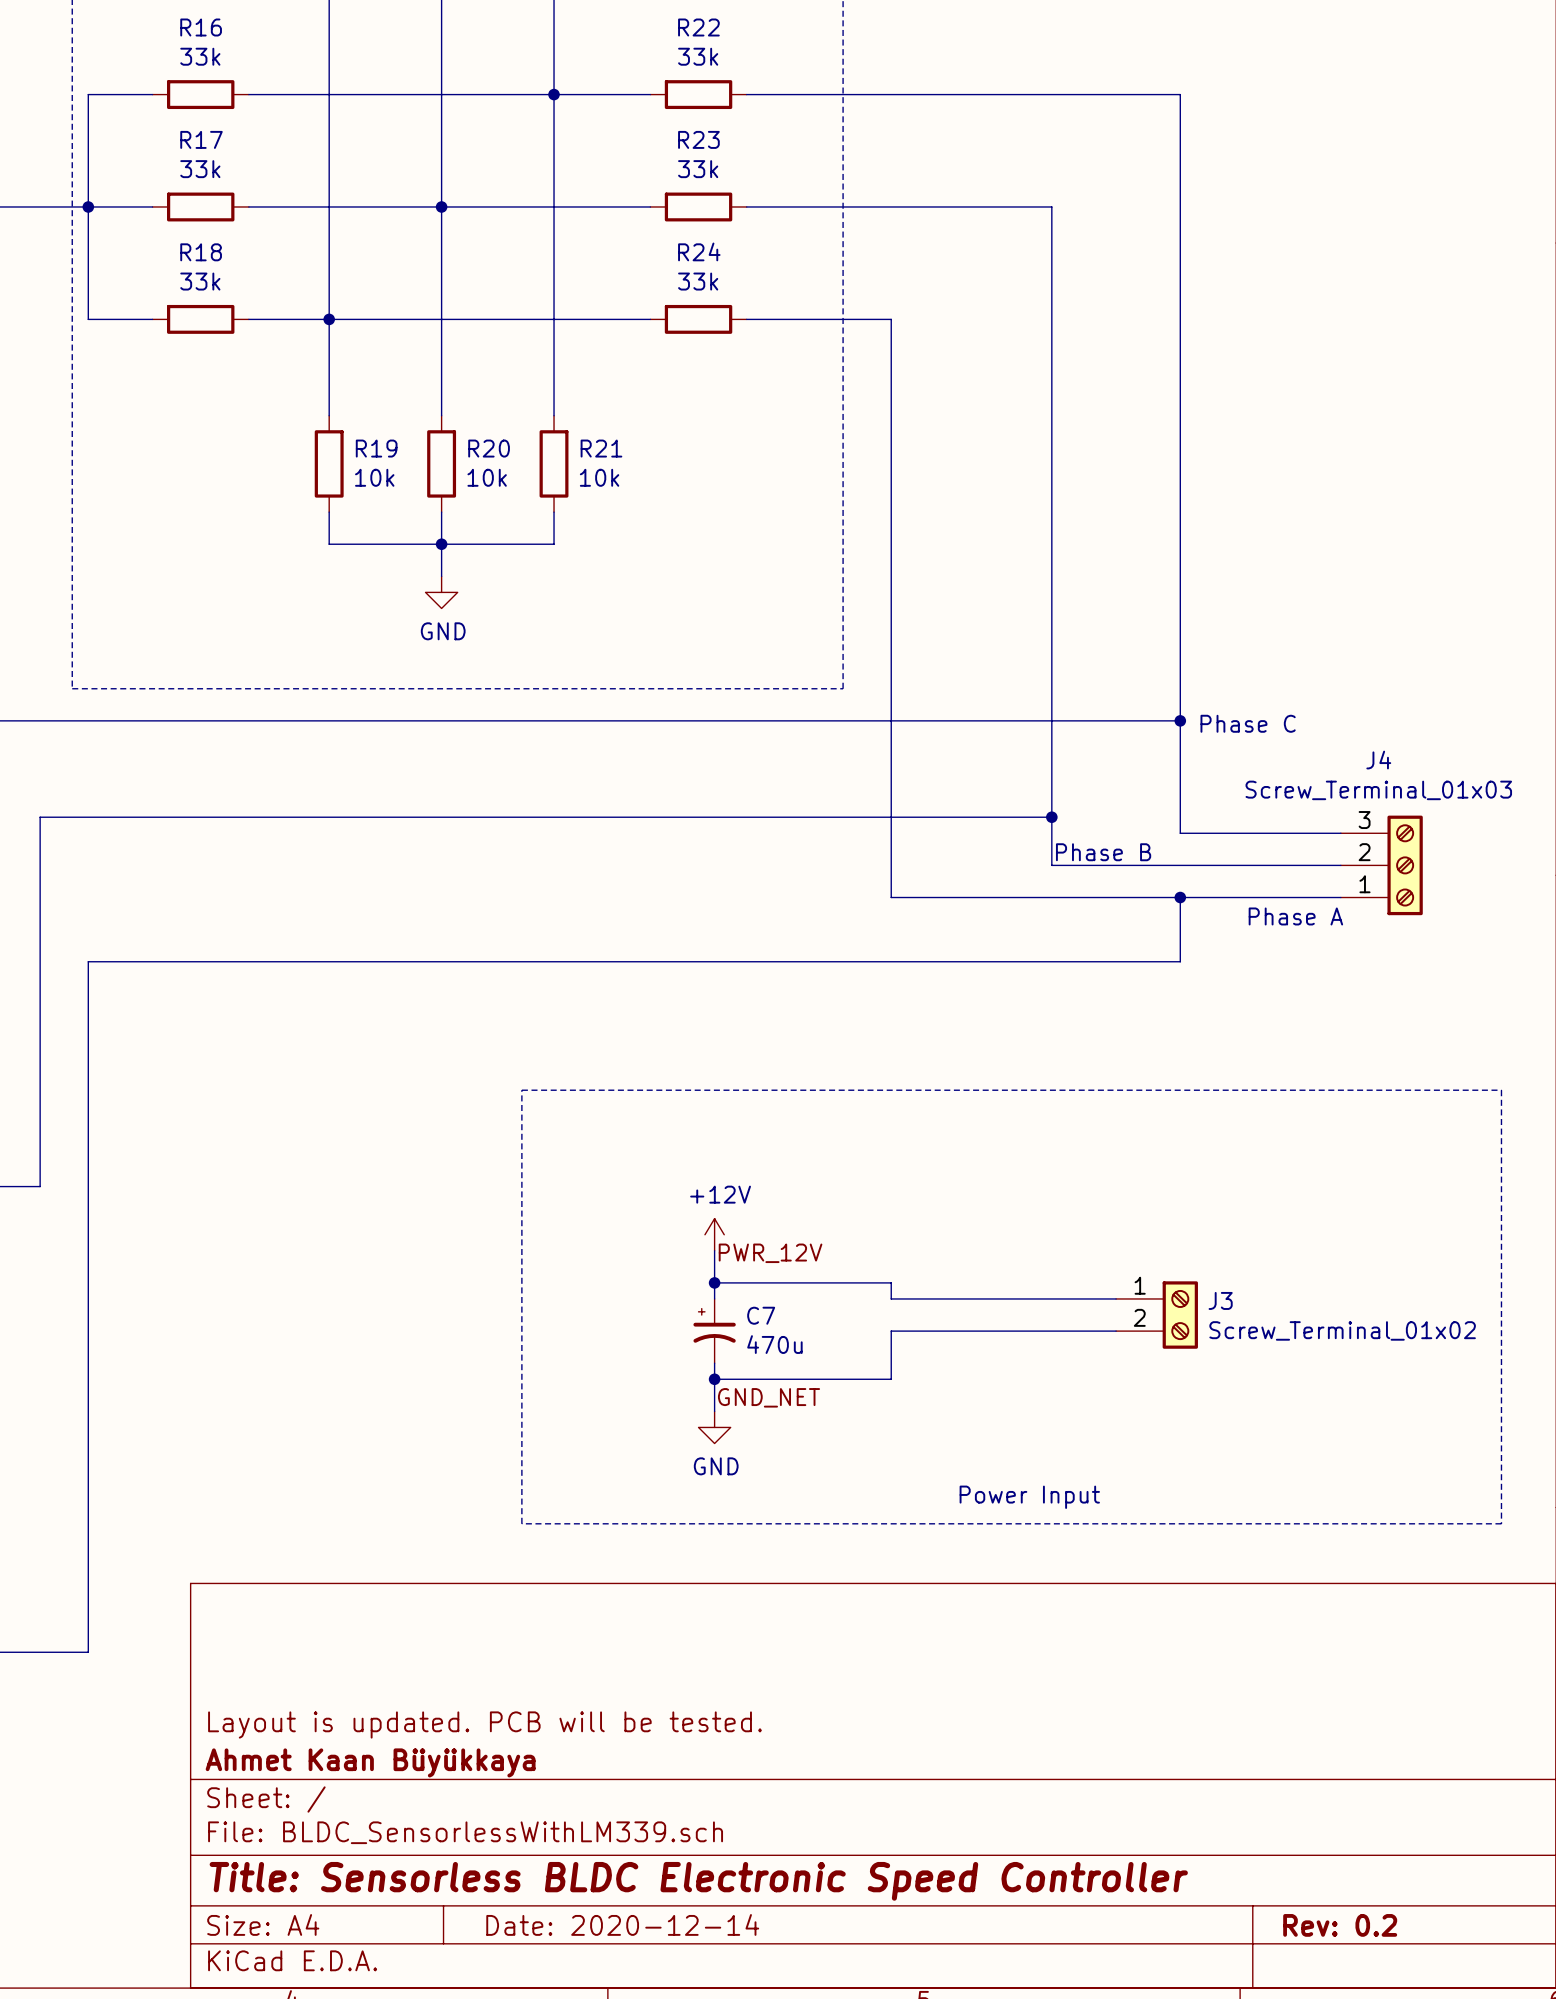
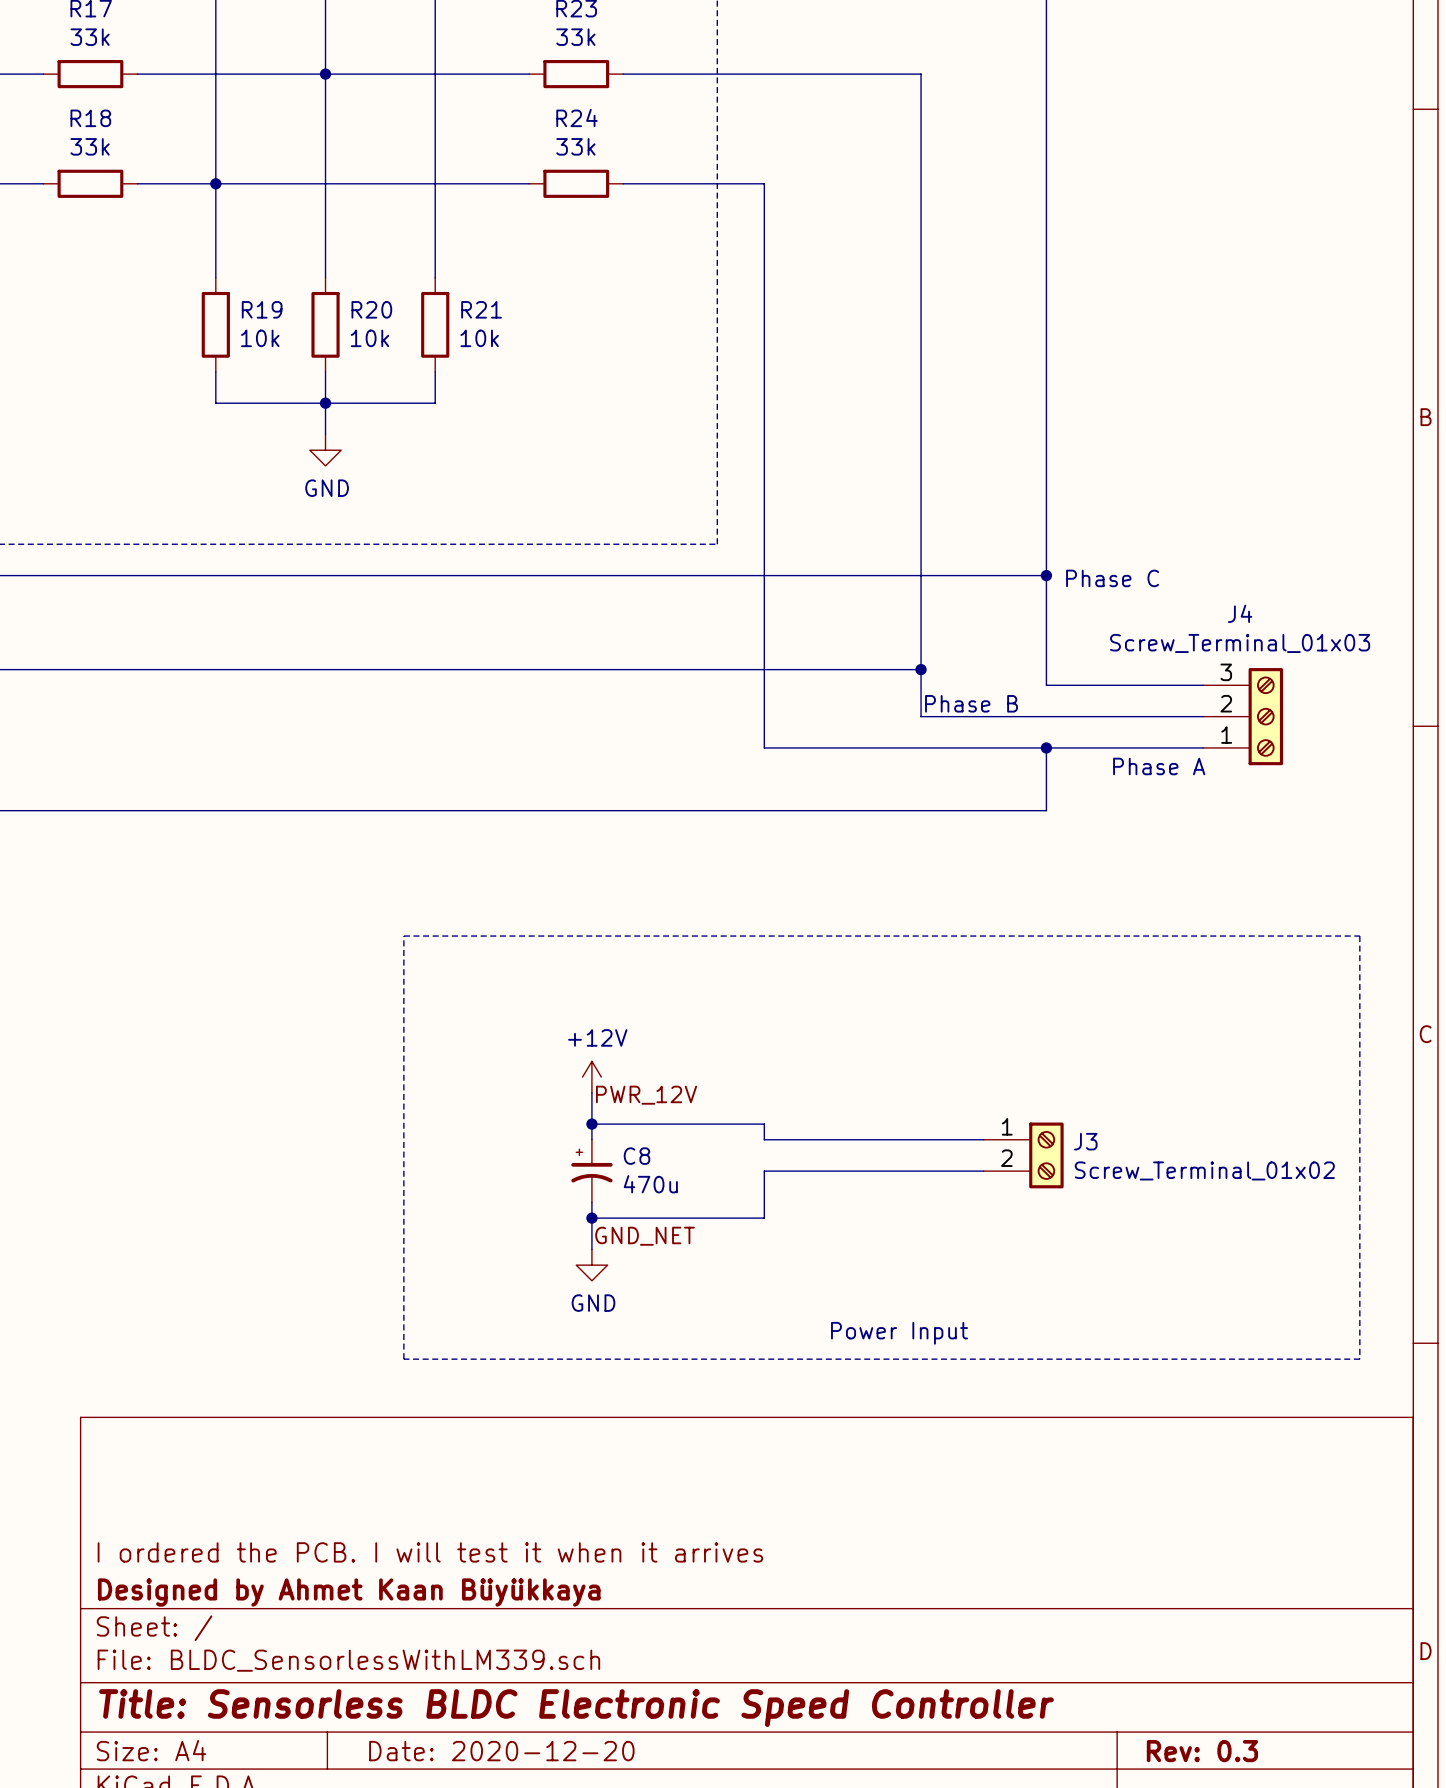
C7 name: C7 (761, 1315) -> C8 (636, 1156)
title block: Layout is updated. PCB will be tested. (484, 1724) -> I ordered the PCB. I will test it when it arrives (430, 1552)
title block: Ahmet Kaan Büyükkaya (370, 1762) -> Designed by Ahmet Kaan Büyükkaya (349, 1592)
title block: Date: 2020-12-14 (622, 1924) -> Date: 2020-12-20 (501, 1751)
title block: Rev: 0.2 (1340, 1925) -> Rev: 0.3 (1202, 1751)

